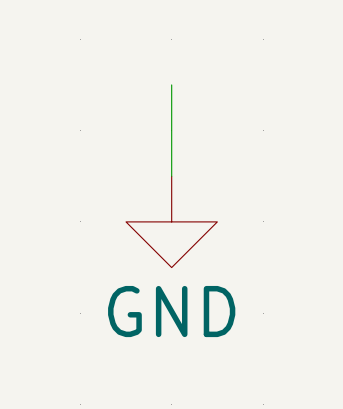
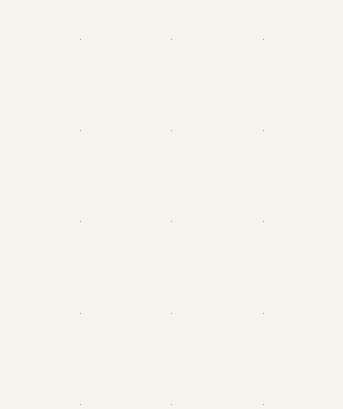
wire: (171, 84) (171, 176) -> none
power symbol: GND (171, 221) -> none

